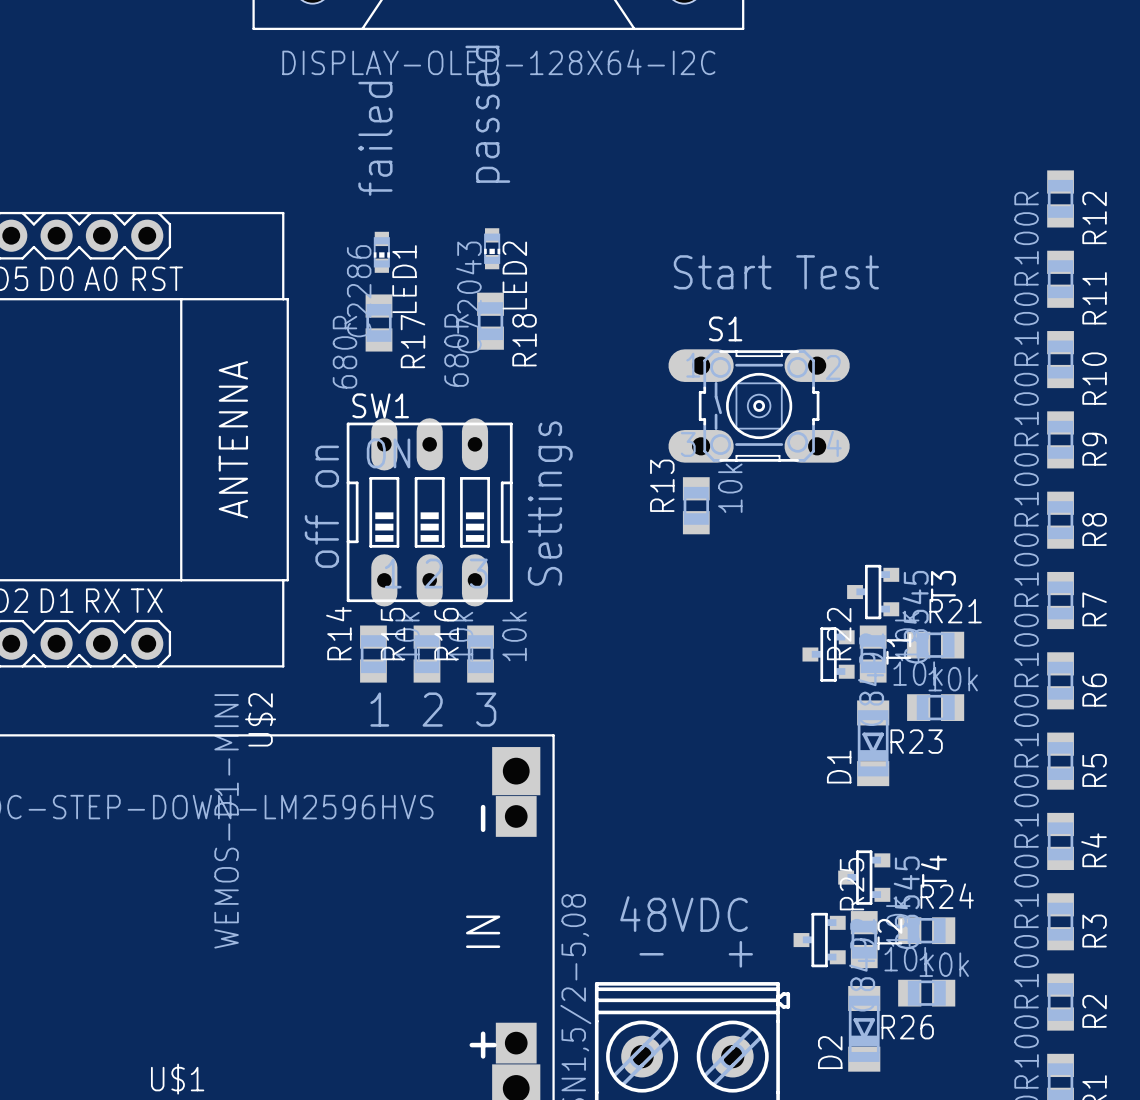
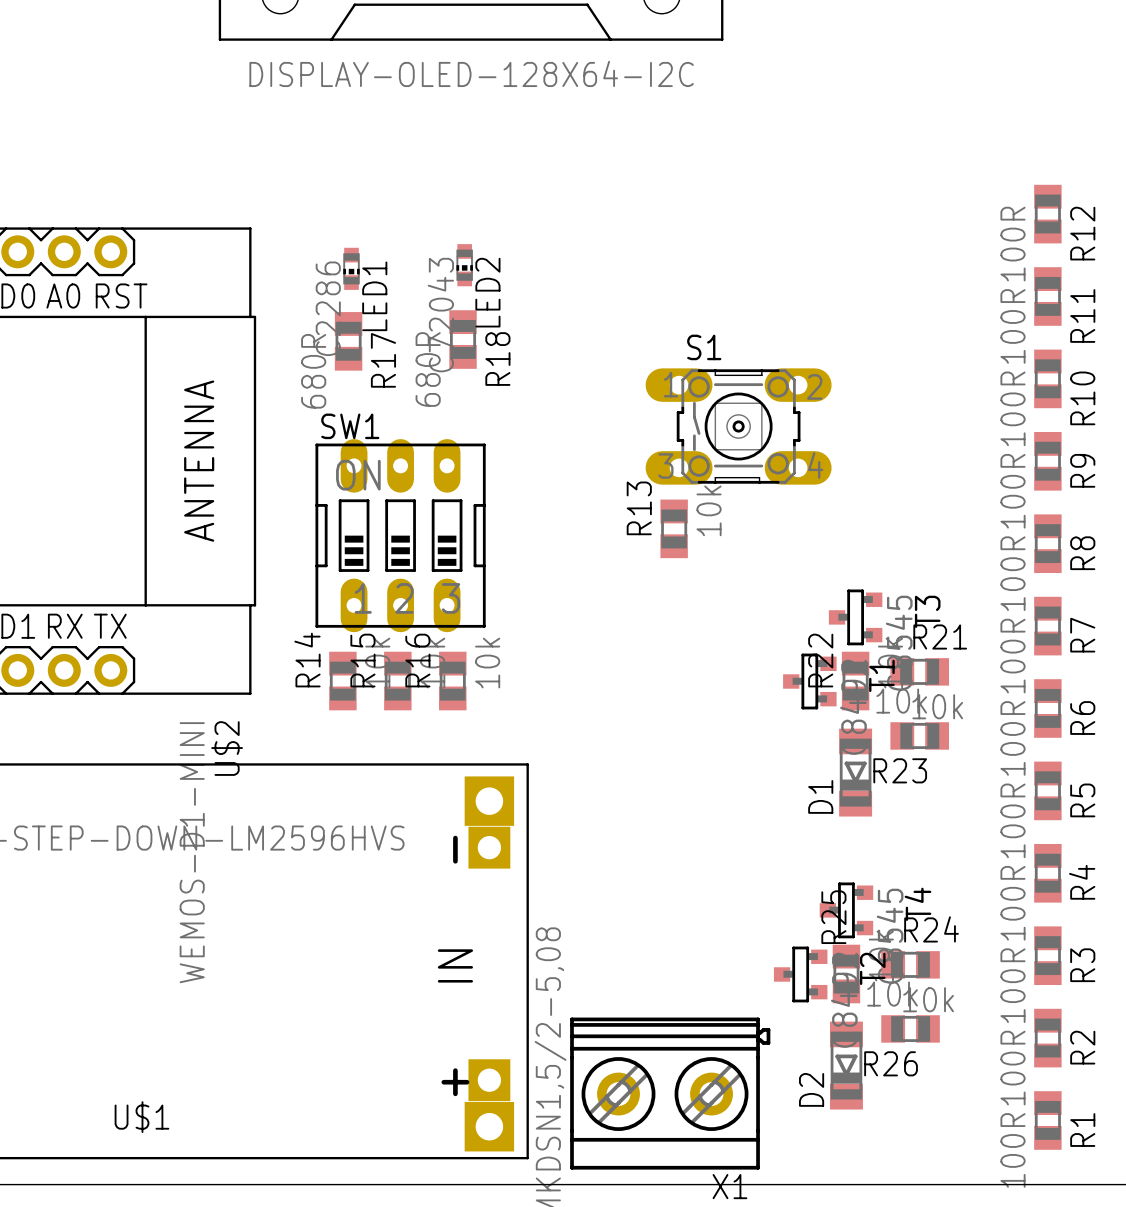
text: passed (487, 114) -> none
text: failed (375, 138) -> none
text: Start Test (776, 272) -> none
text: on (327, 466) -> none
text: Settings (550, 503) -> none
text: off (321, 541) -> none
text: 1 (379, 709) -> none
text: 2 (432, 709) -> none
text: 3 (486, 709) -> none
text: 48VDC (684, 914) -> none
text: - (651, 954) -> none
text: + (740, 954) -> none

